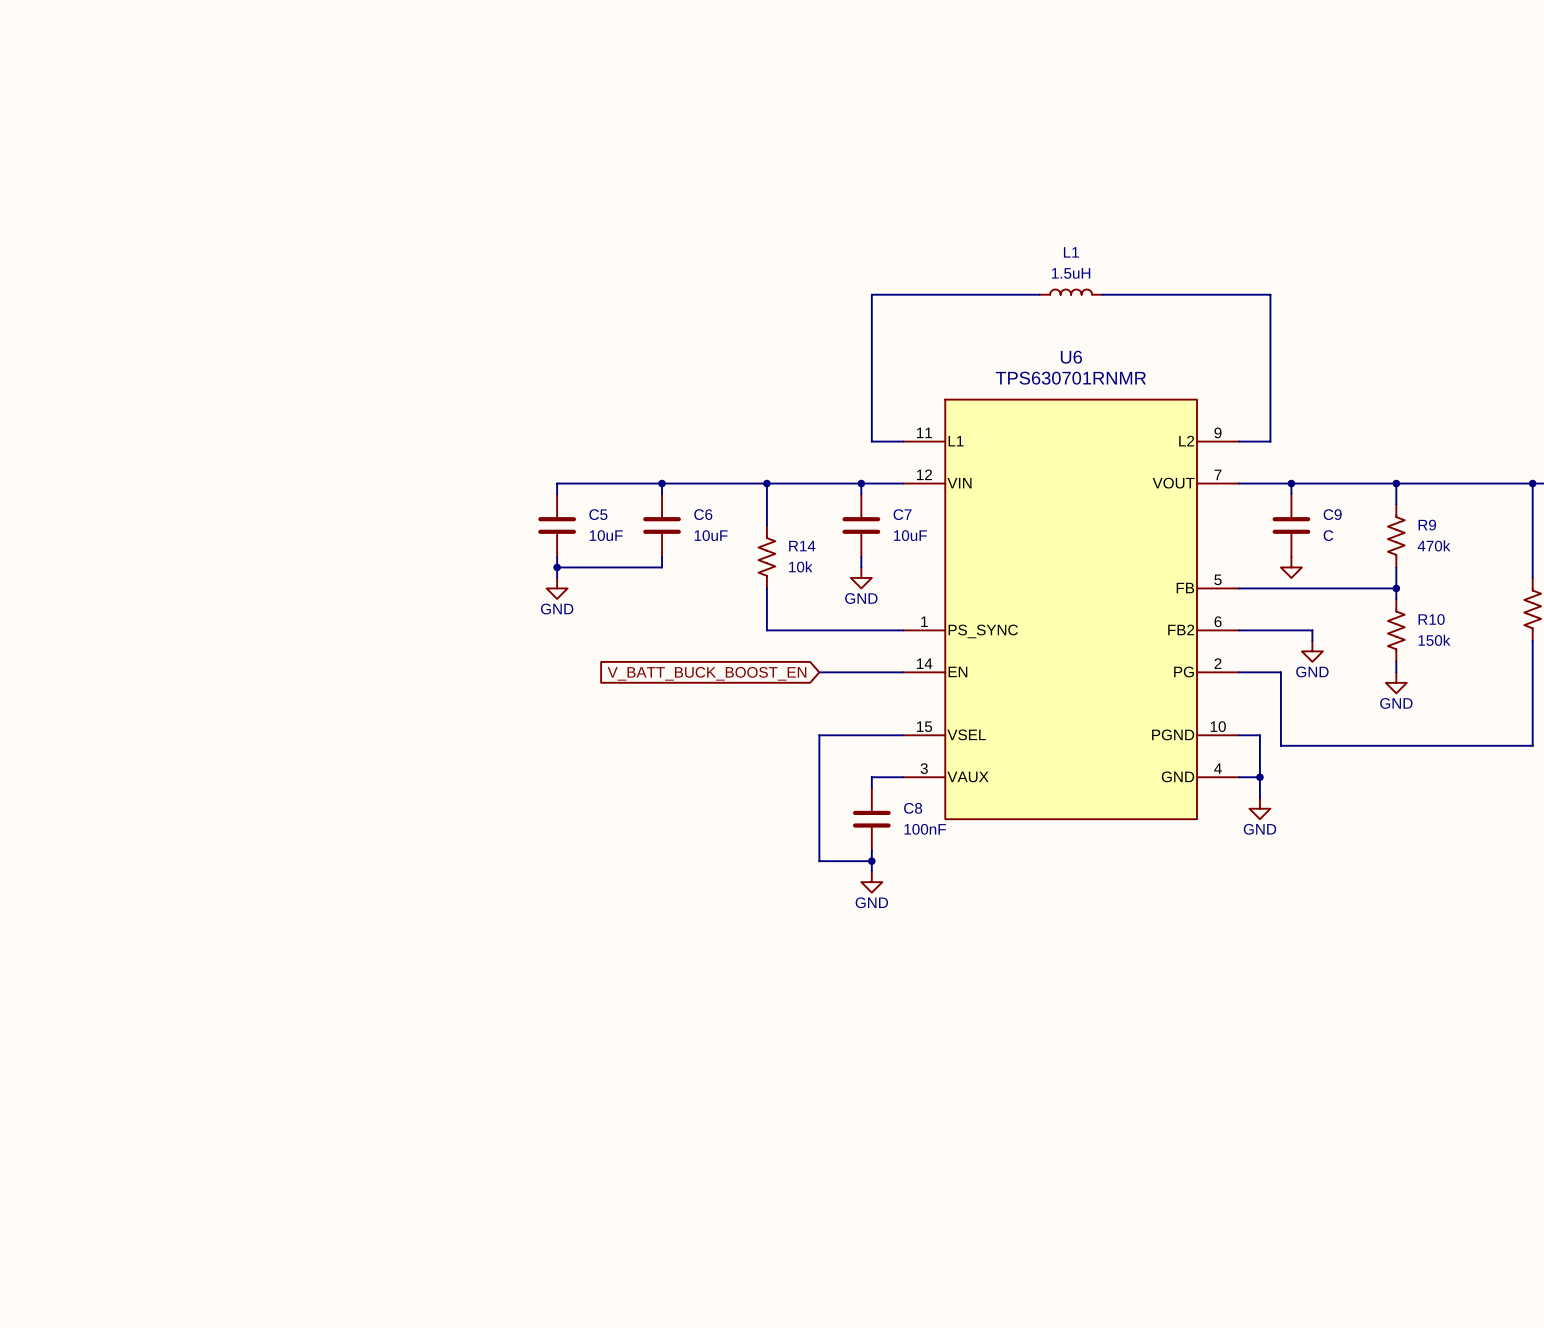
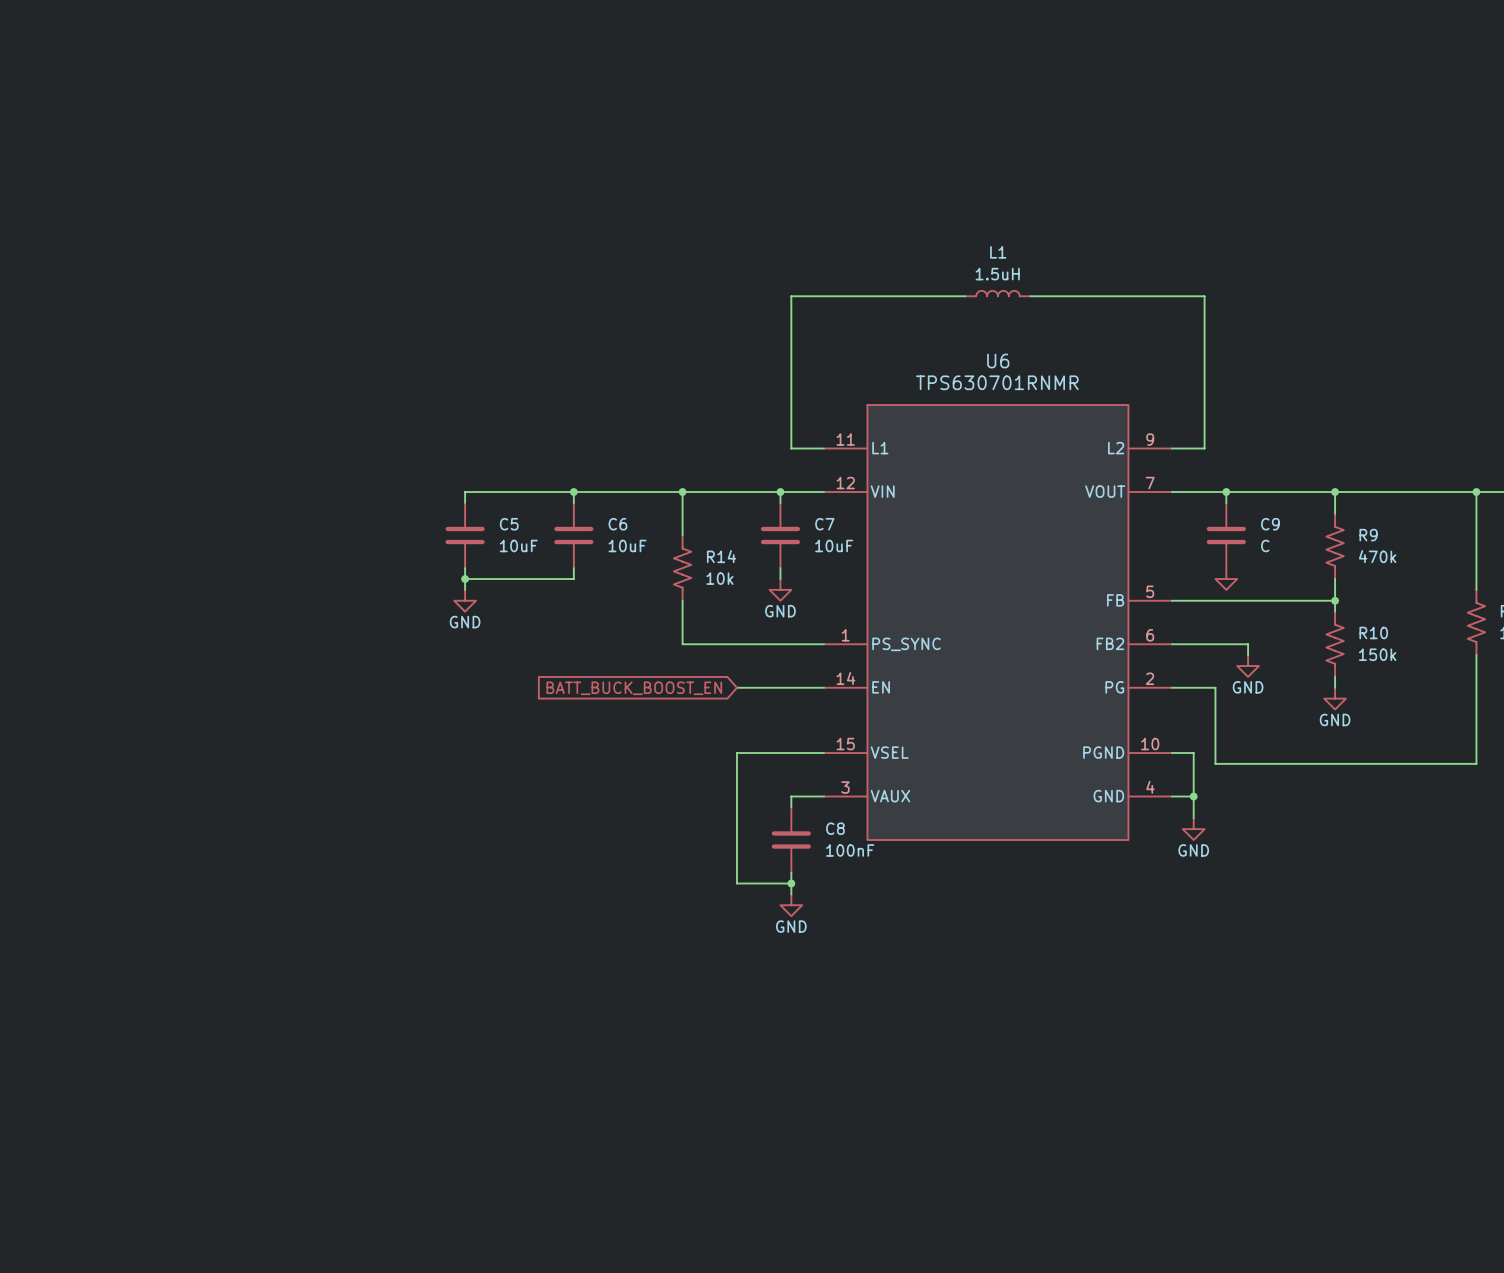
global label: V_BATT_BUCK_BOOST_EN (706, 673) -> BATT_BUCK_BOOST_EN (634, 688)

